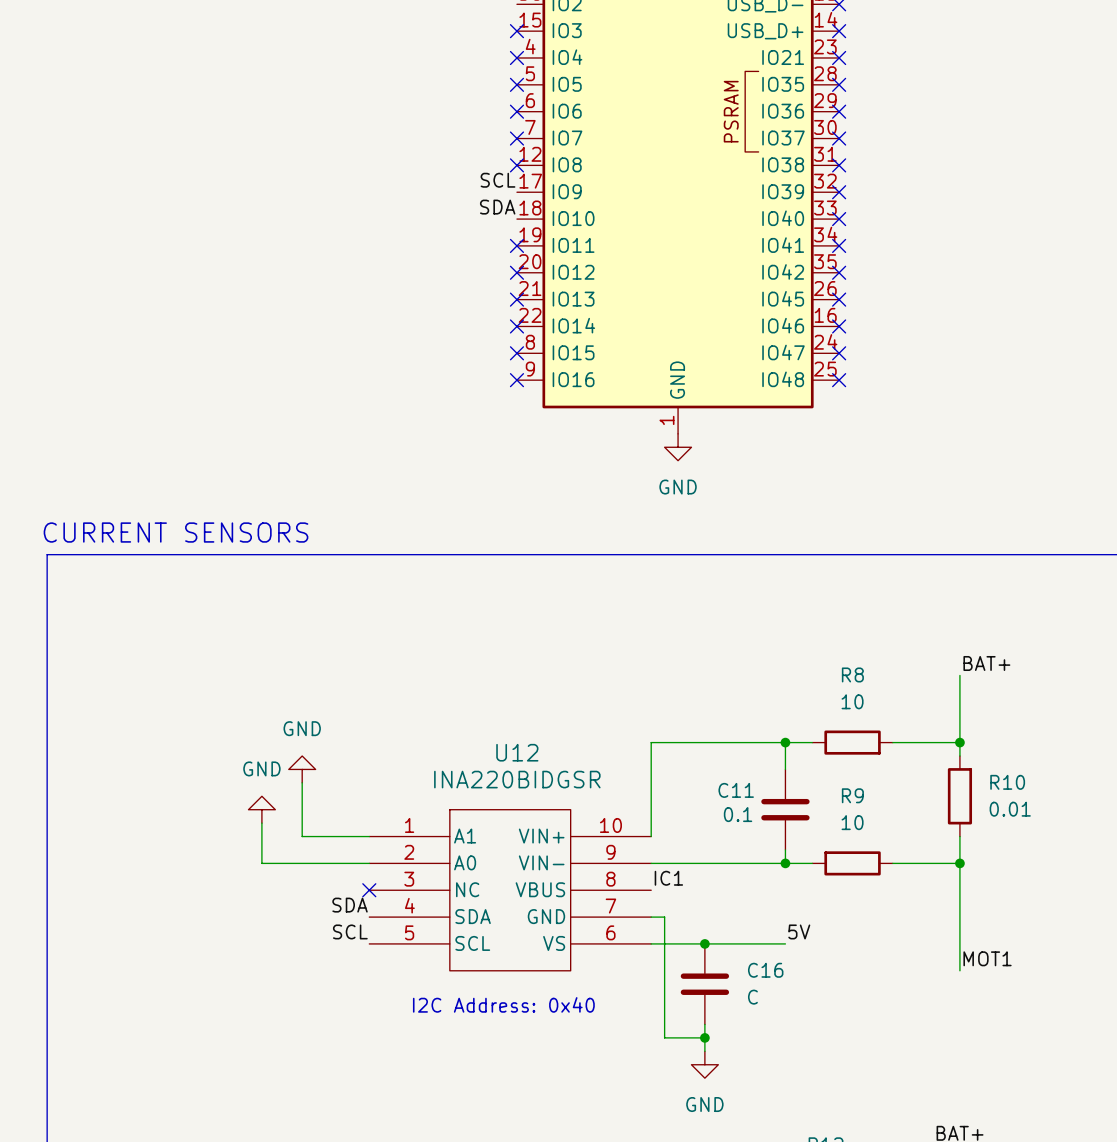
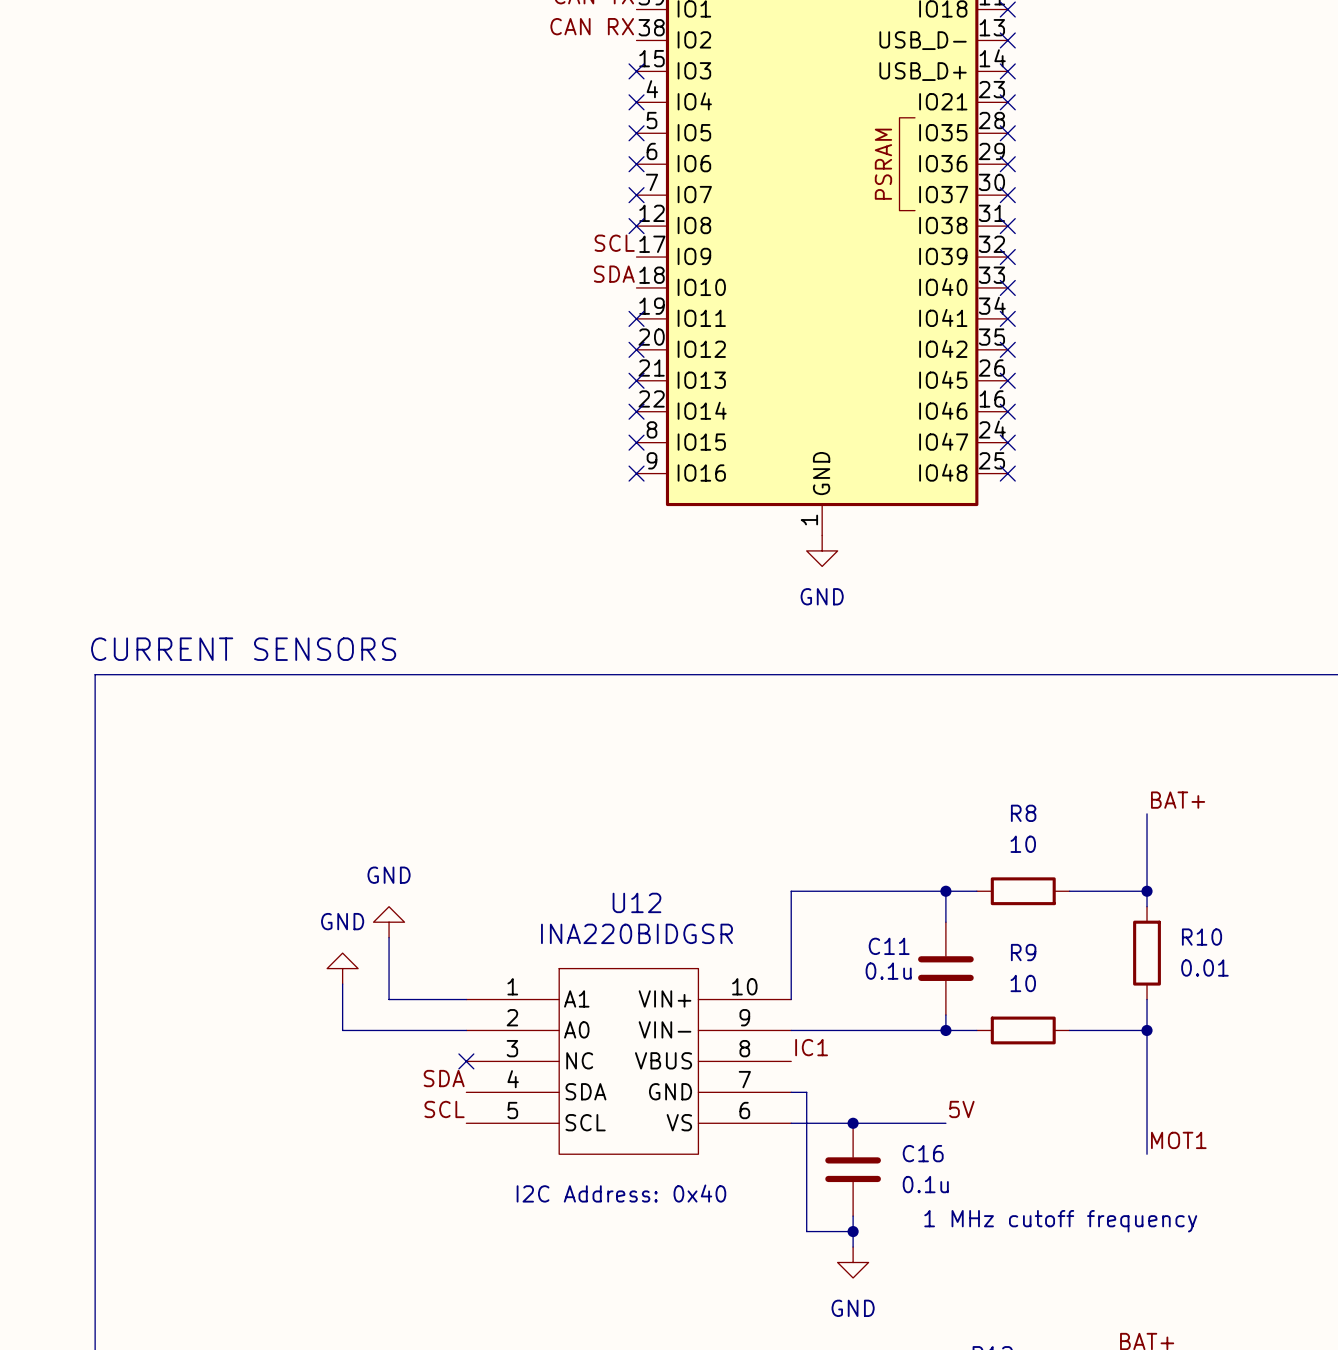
C11 value: 0.1 (738, 814) -> 0.1u (888, 971)
C16 value: C (752, 997) -> 0.1u (925, 1184)
text: none -> 1 MHz cutoff frequency (1060, 1221)

